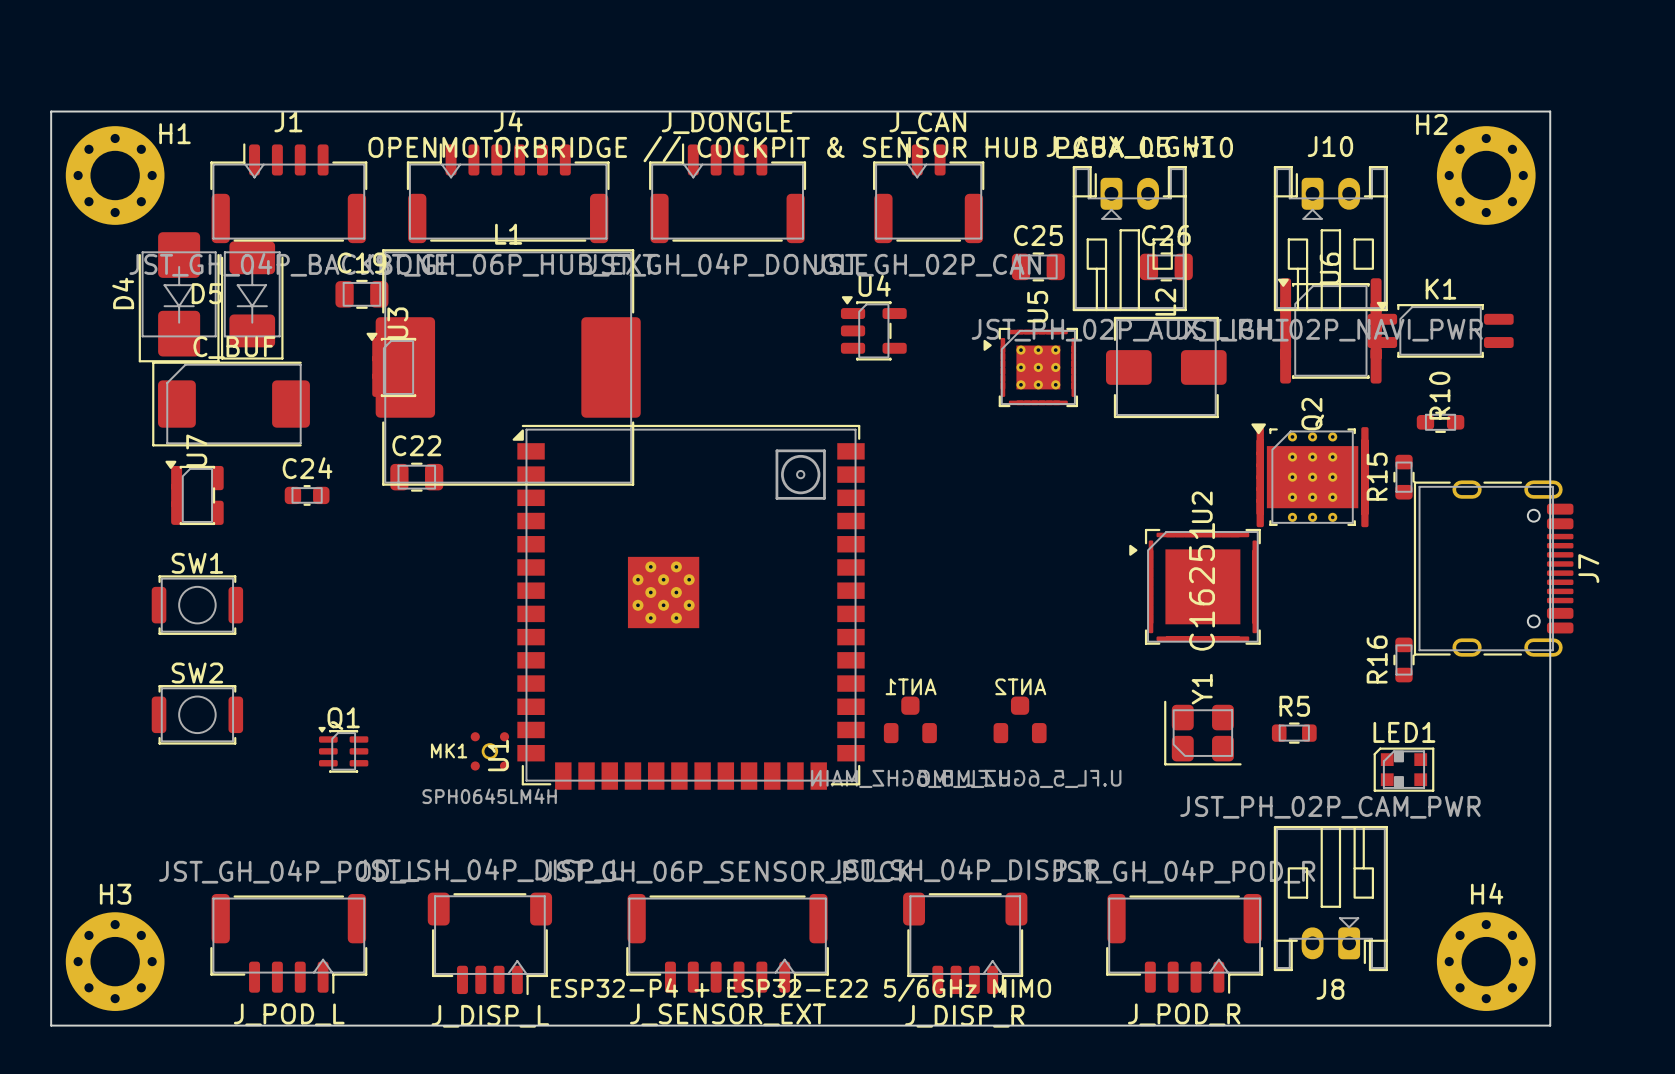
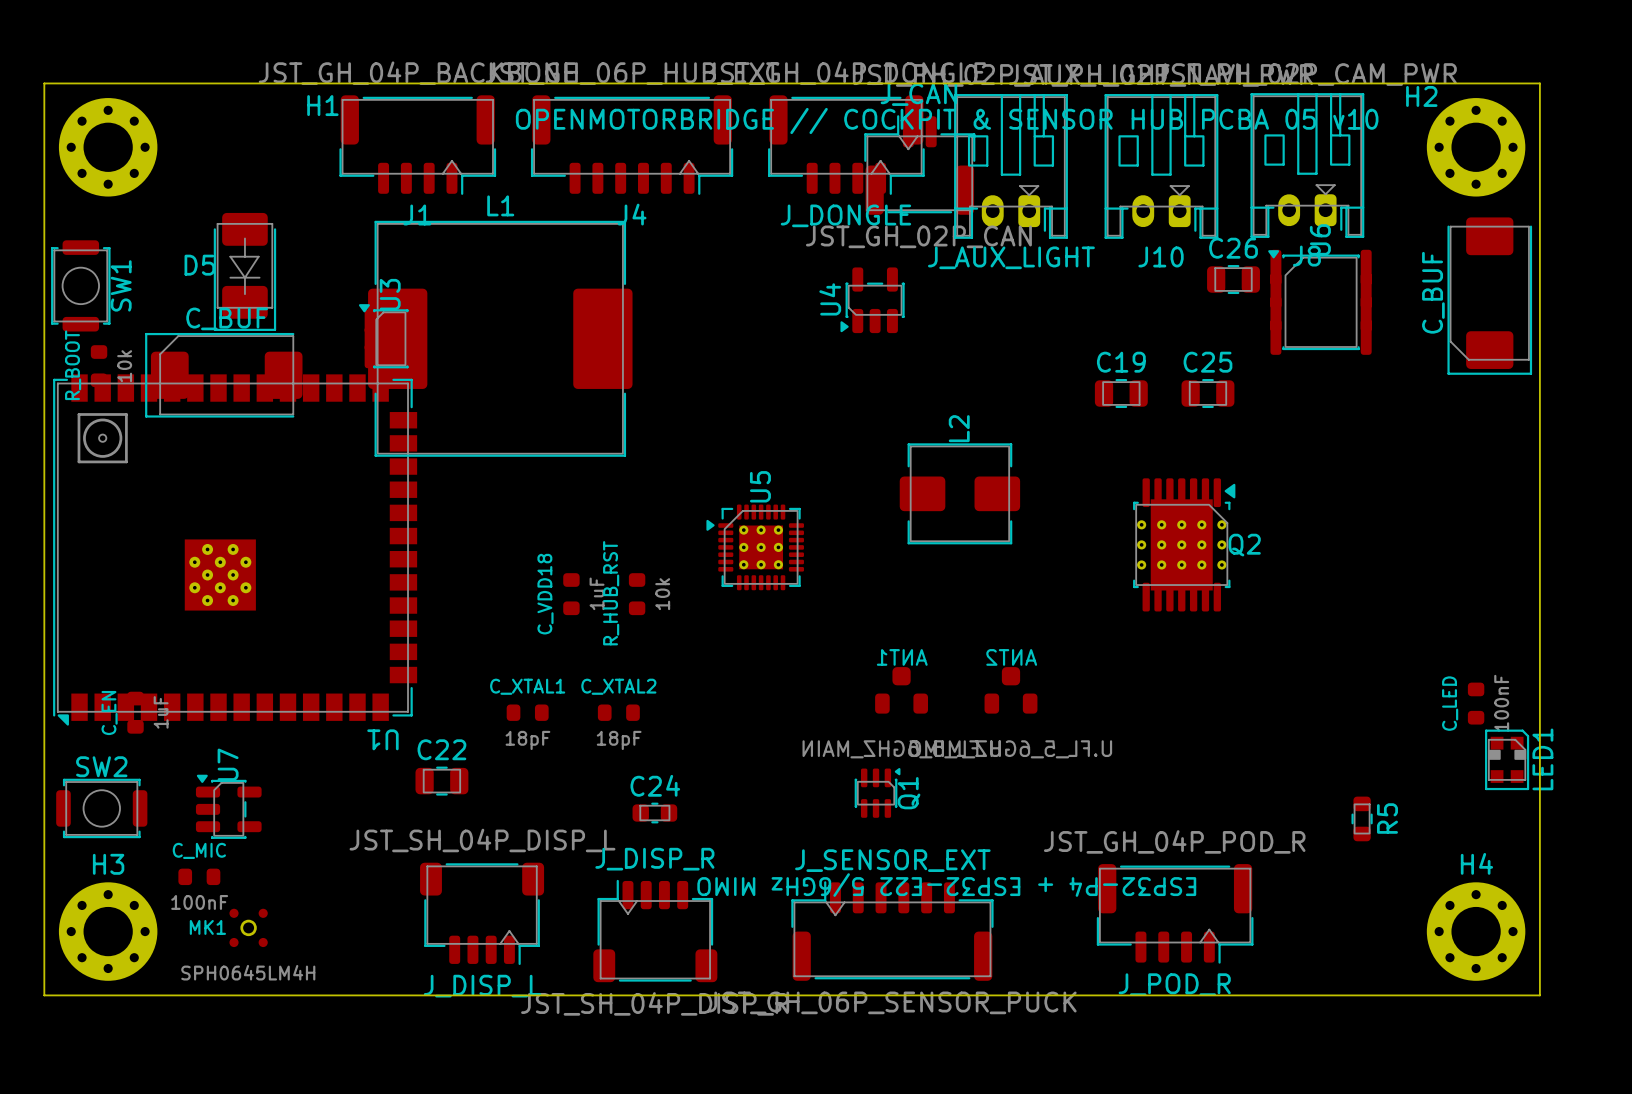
H1 name position: H1 (174, 133) -> H1 (322, 105)
text position: OPENMOTORBRIDGE // COCKPIT & SENSOR HUB PCBA 05 v10 (800, 149) -> OPENMOTORBRIDGE // COCKPIT & SENSOR HUB PCBA 05 v10 (947, 120)
J1 rotation: 0° (288, 193) -> 180° (417, 145)
J1 position: (288, 193) -> (417, 145)
J4 rotation: 0° (508, 193) -> 180° (632, 145)
J4 position: (508, 193) -> (632, 145)
J_DONGLE rotation: 0° (727, 193) -> 180° (846, 145)
J_DONGLE position: (727, 193) -> (846, 145)
J_AUX_LIGHT rotation: 0° (1129, 238) -> 180° (1010, 166)
J_AUX_LIGHT position: (1129, 238) -> (1010, 166)
J10 rotation: 0° (1330, 238) -> 180° (1161, 166)
J10 position: (1330, 238) -> (1161, 166)
C25 position: (1038, 266) -> (1207, 393)
C26 position: (1166, 266) -> (1233, 279)
C19 position: (361, 294) -> (1121, 393)
D4: (179, 297) -> none
C_BUF: none -> (1489, 296)
U5 footprint: [983, 327, 1079, 408] -> [706, 504, 804, 591]
U4 rotation: 0° (873, 328) -> 90° counterclockwise (872, 300)
K1: (1440, 329) -> none
L2 position: (1166, 367) -> (959, 493)
R_BOOT: none -> 10k (99, 366)
Q2 name position: Q2 (1312, 414) -> Q2 (1244, 545)
R10: (1440, 422) -> none
Q2 footprint: [1251, 423, 1369, 528] -> [1133, 478, 1236, 612]
U7 footprint: [165, 460, 224, 526] -> [195, 774, 262, 839]
C22 position: (416, 477) -> (441, 781)
R15: (1403, 477) -> none
C24 position: (307, 495) -> (654, 813)
J7: (1493, 568) -> none
U2: (1195, 586) -> none
SW1 rotation: 0° (197, 605) -> 90° clockwise (80, 285)
SW1 position: (197, 605) -> (80, 285)
U1 rotation: 0° (688, 607) -> 90° counterclockwise (235, 550)
U1 position: (688, 607) -> (235, 550)
C_VDD18: none -> 1uF (571, 594)
R_HUB_RST: none -> 10k (637, 594)
R16: (1403, 659) -> none
SW2 position: (197, 714) -> (101, 808)
Y1: (1202, 733) -> none
R5 rotation: 0° (1294, 733) -> 90° clockwise (1362, 818)
R5 position: (1294, 733) -> (1362, 818)
C_LED: none -> 100nF (1476, 703)
C_EN: none -> 1uF (135, 712)
C_XTAL1: none -> 18pF (527, 712)
C_XTAL2: none -> 18pF (618, 712)
Q1 rotation: 0° (343, 749) -> 90° clockwise (877, 792)
Q1 position: (343, 749) -> (877, 792)
MK1 position: (489, 751) -> (248, 927)
LED1 rotation: 0° (1403, 769) -> 90° clockwise (1507, 759)
LED1 position: (1403, 769) -> (1507, 759)
J8 position: (1330, 898) -> (1307, 165)
C_MIC: none -> 100nF (199, 876)
J_POD_L: JST_GH_04P_POD_L (288, 943) -> none
J_SENSOR_EXT rotation: 0° (727, 943) -> 180° (892, 931)
J_SENSOR_EXT position: (727, 943) -> (892, 931)
J_DISP_R rotation: 0° (965, 943) -> 180° (655, 931)
J_DISP_R position: (965, 943) -> (655, 931)
text rotation: 0° (801, 989) -> 180° (946, 885)

